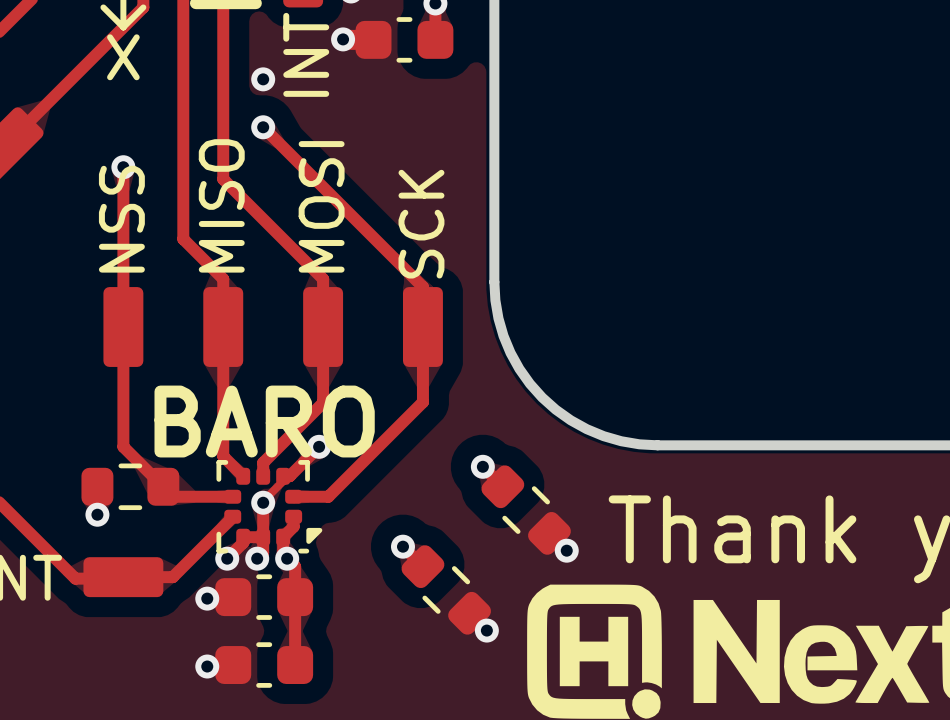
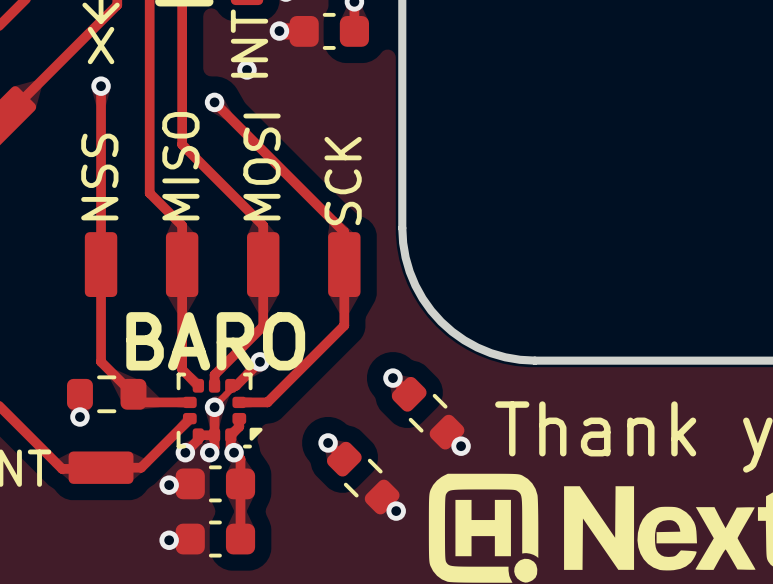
via position: (263, 79) -> (247, 69)
track: none -> (101, 86) (101, 134)
via position: (123, 167) -> (101, 86)

